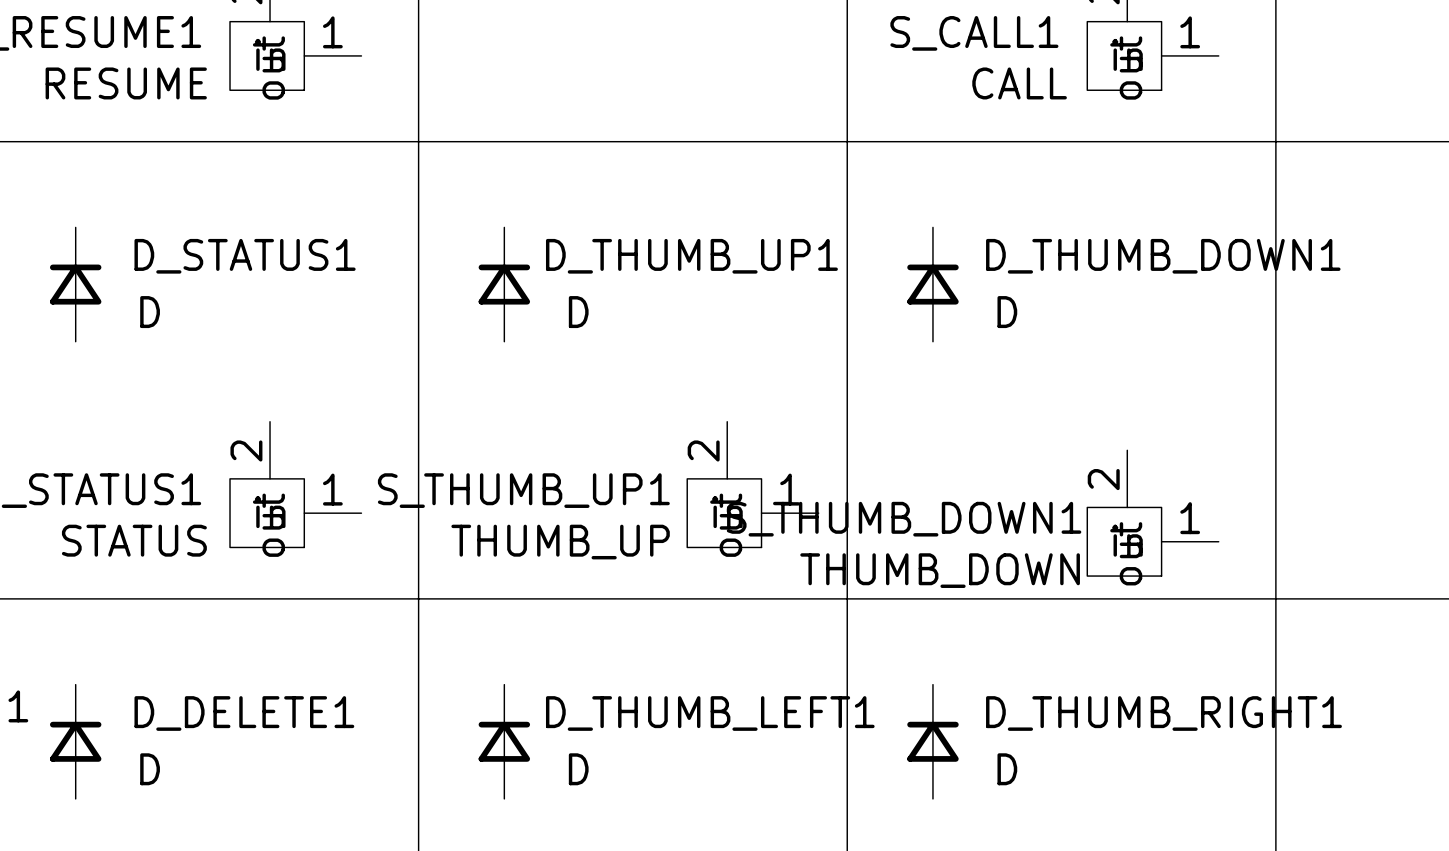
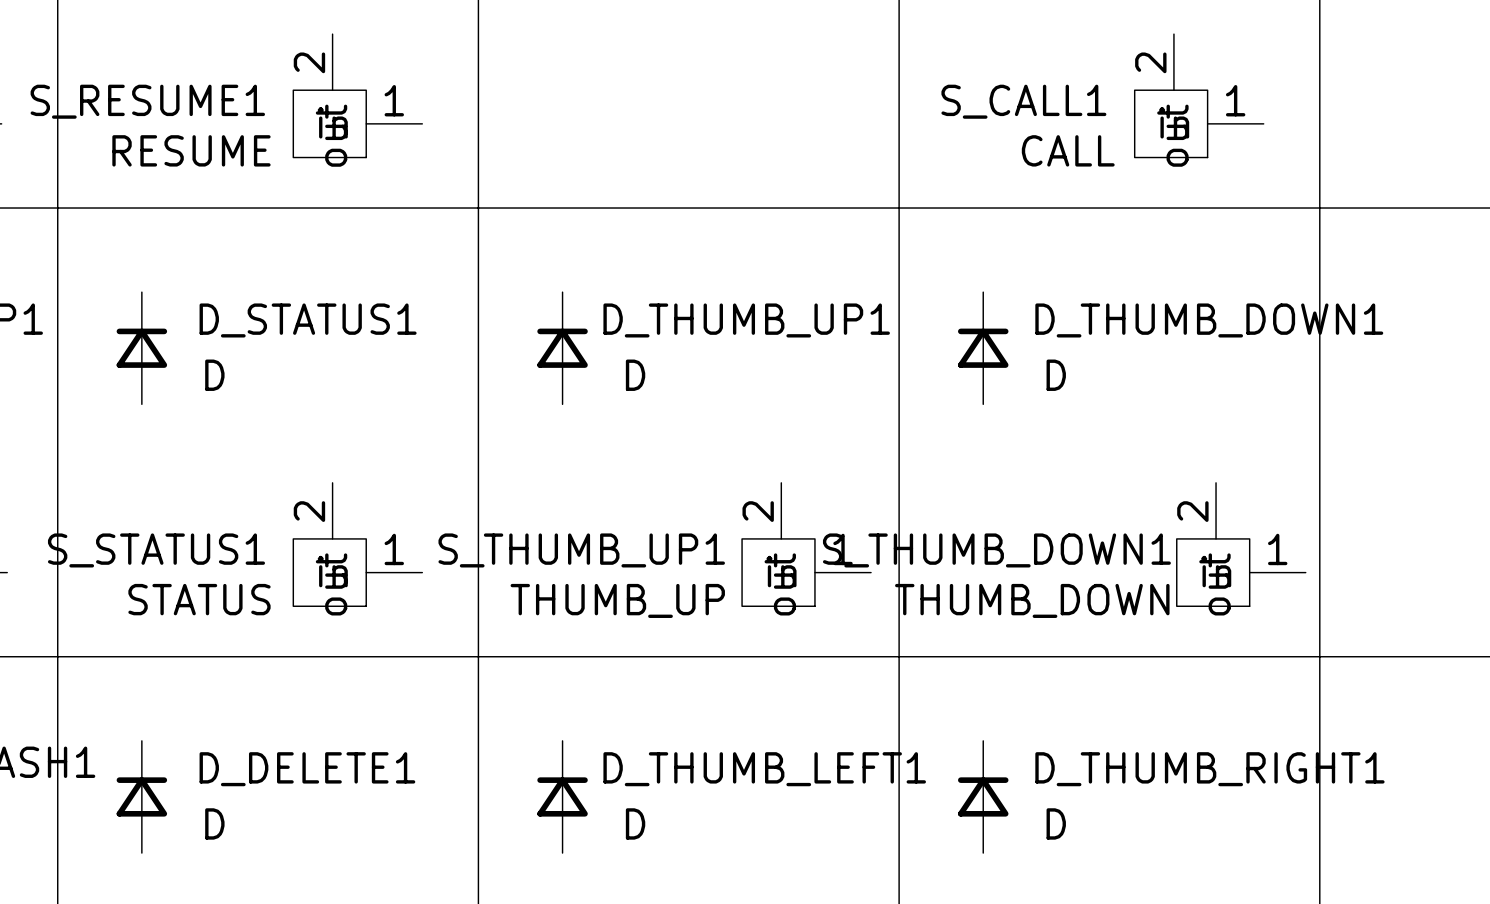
S_THUMB_DOWN1 position: (1153, 513) -> (1241, 544)

